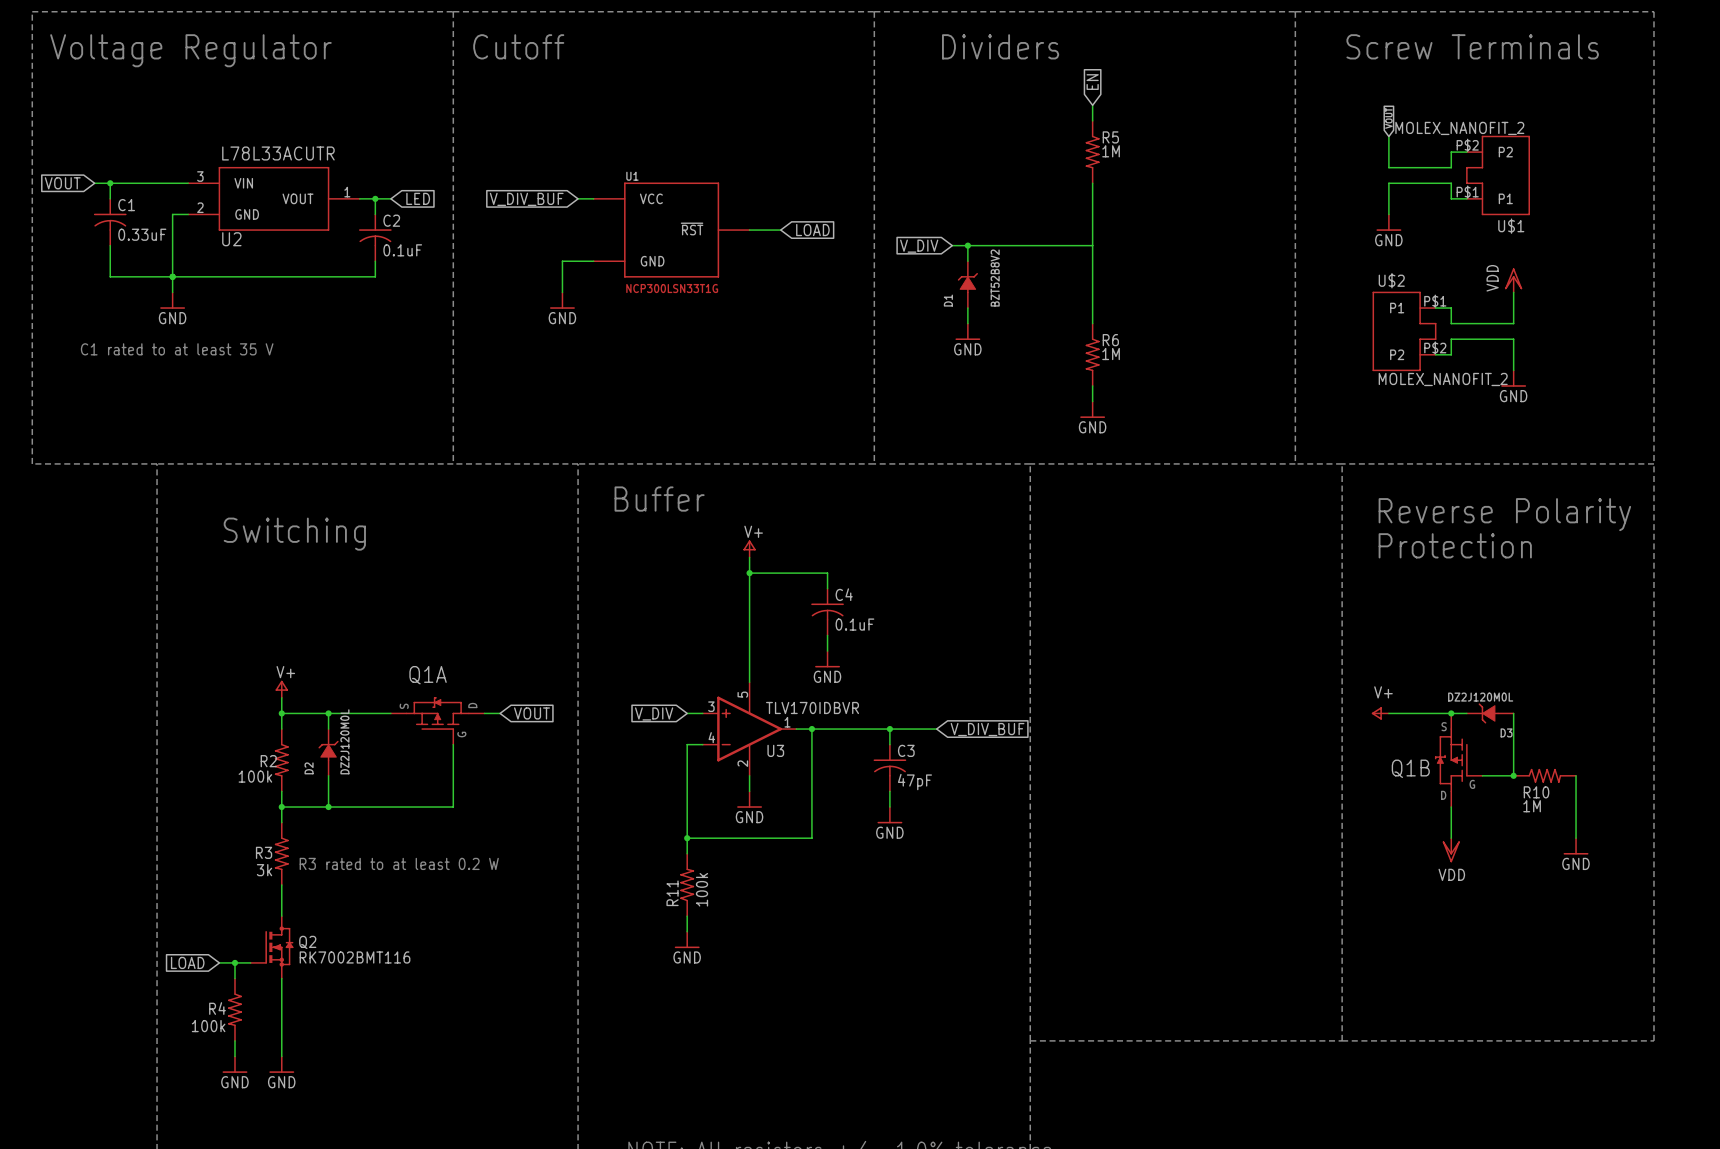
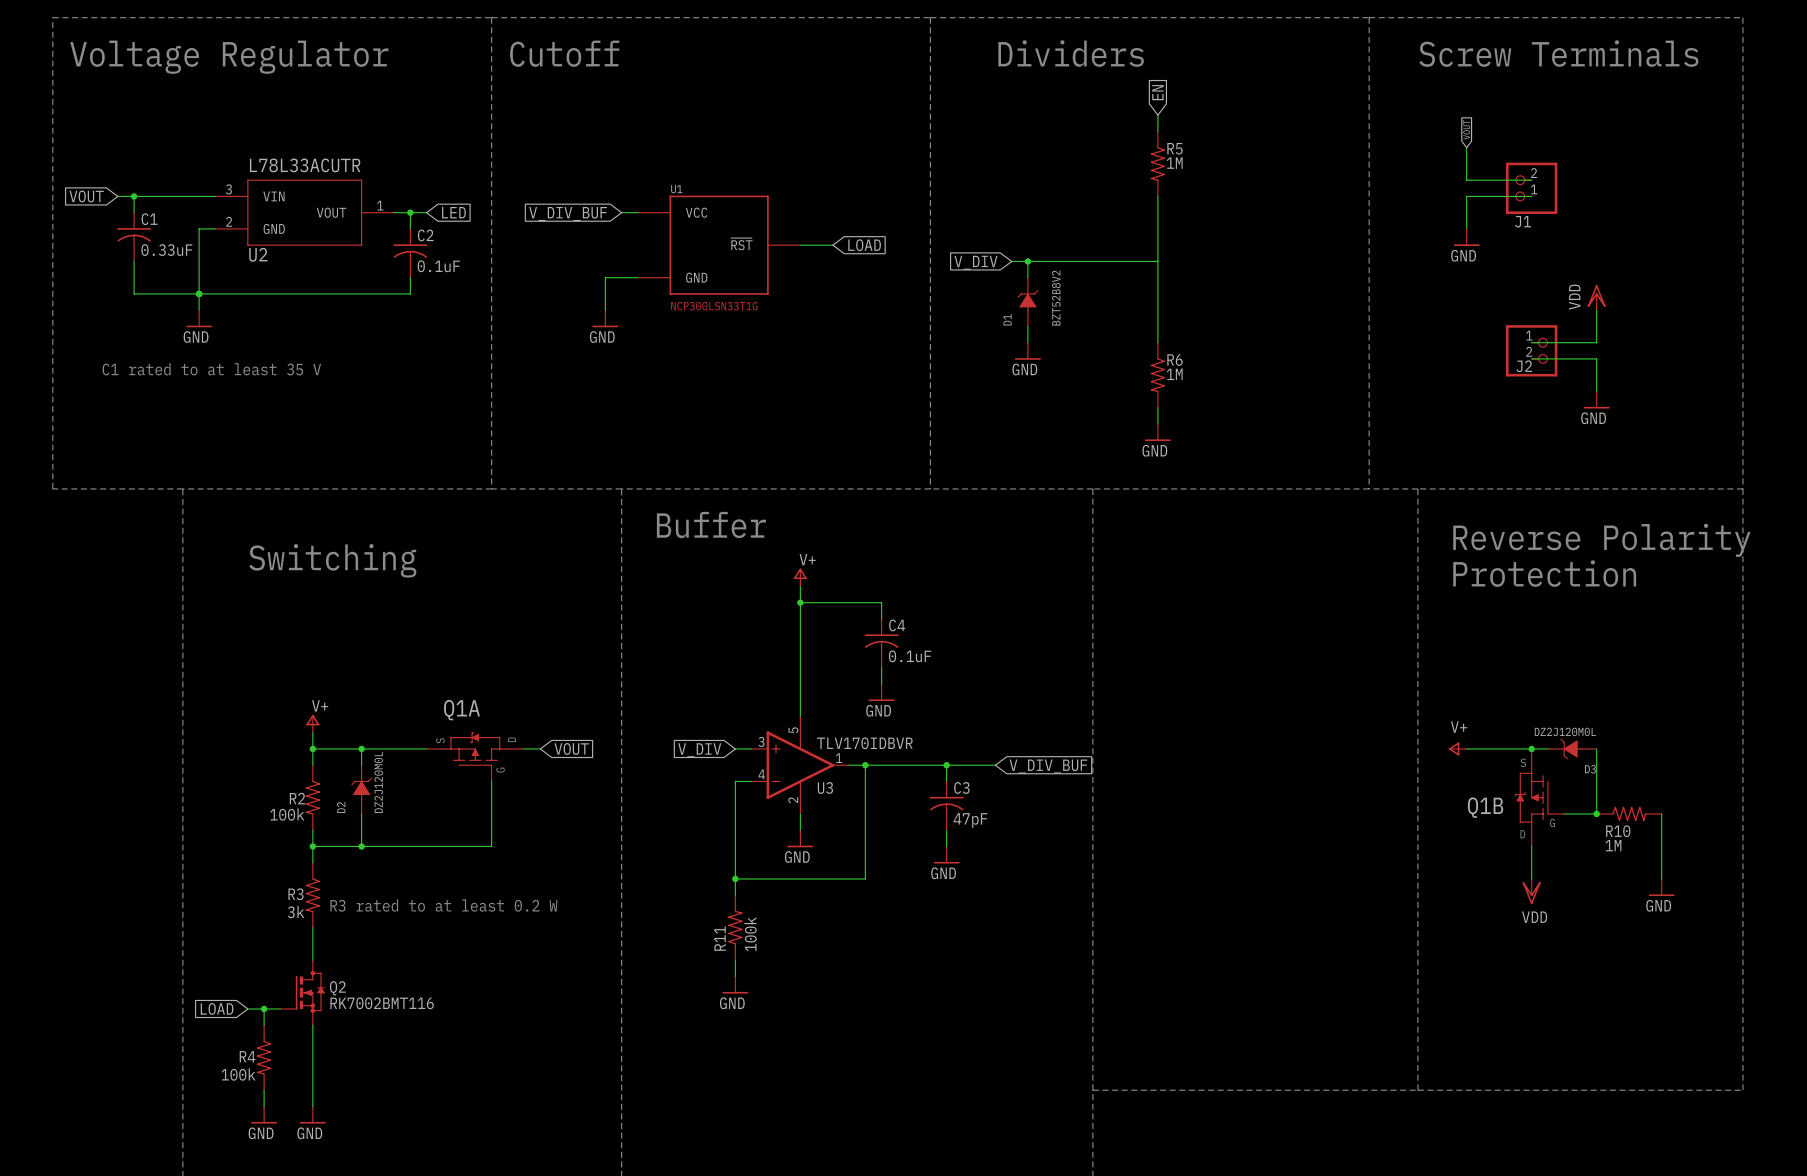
J1: none -> (1531, 188)
U$1: MOLEX_NANOFIT_2 (1498, 175) -> none
wire: (1451, 183) (1451, 198) (1466, 198) -> none
U$2: MOLEX_NANOFIT_2 (1404, 331) -> none
J2: none -> (1531, 350)

